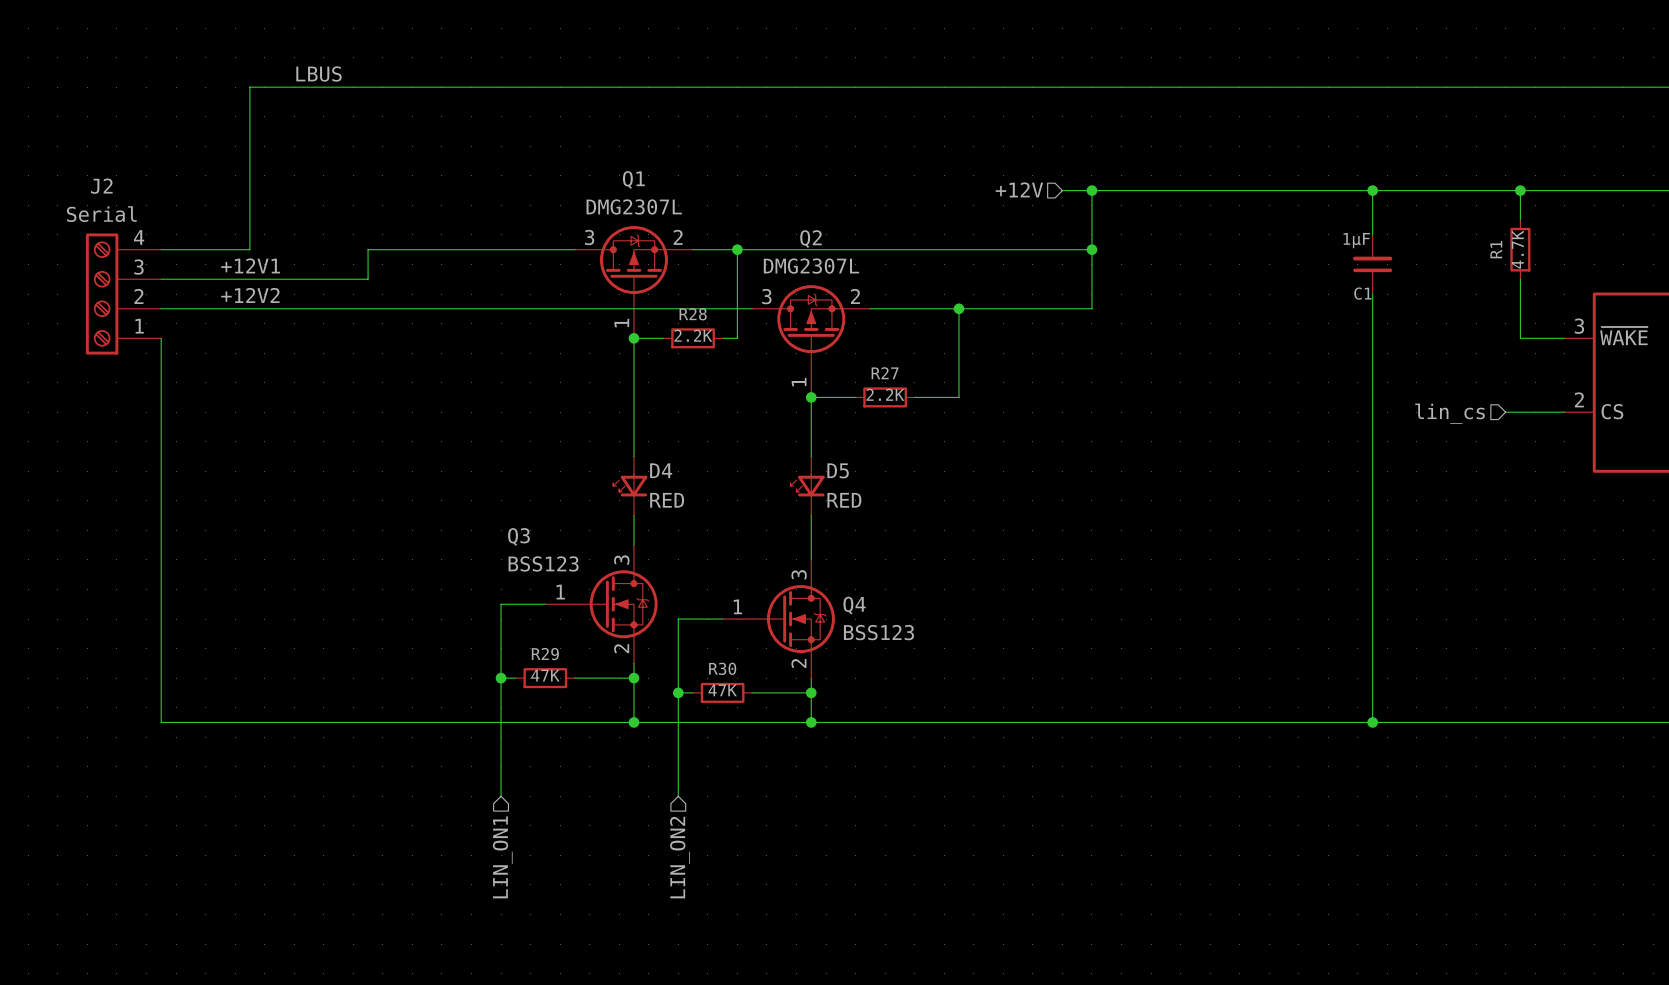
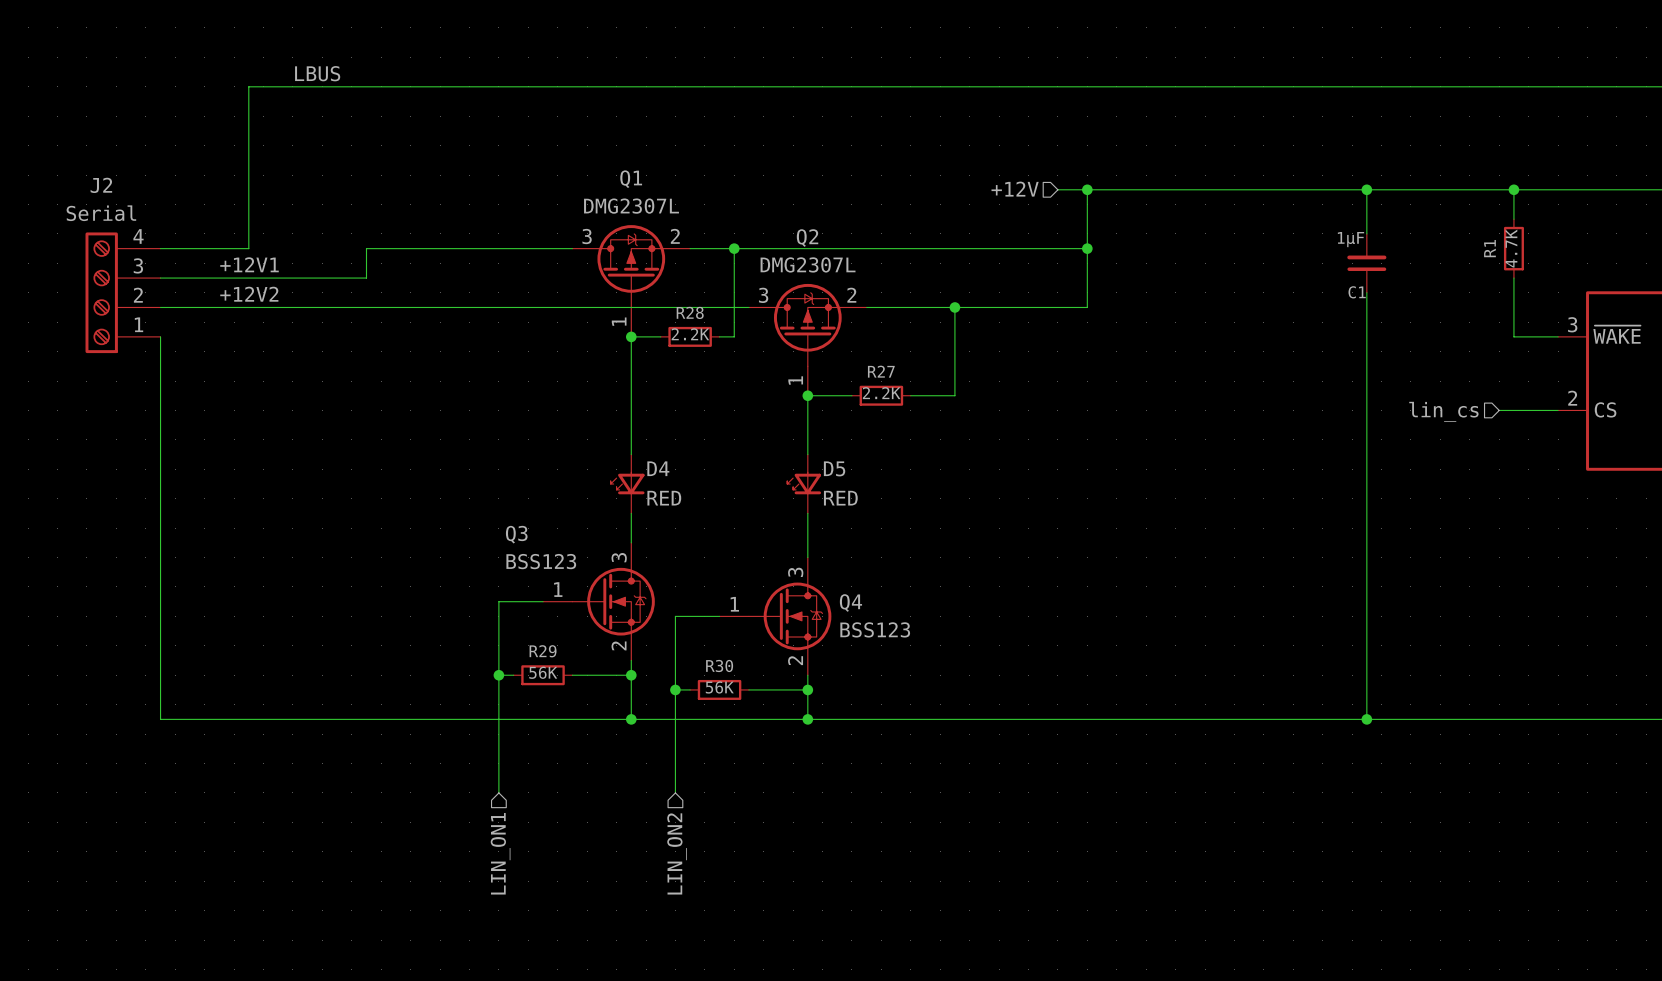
R29 value: 47K (545, 675) -> 56K (543, 672)
R30 value: 47K (722, 690) -> 56K (719, 687)

